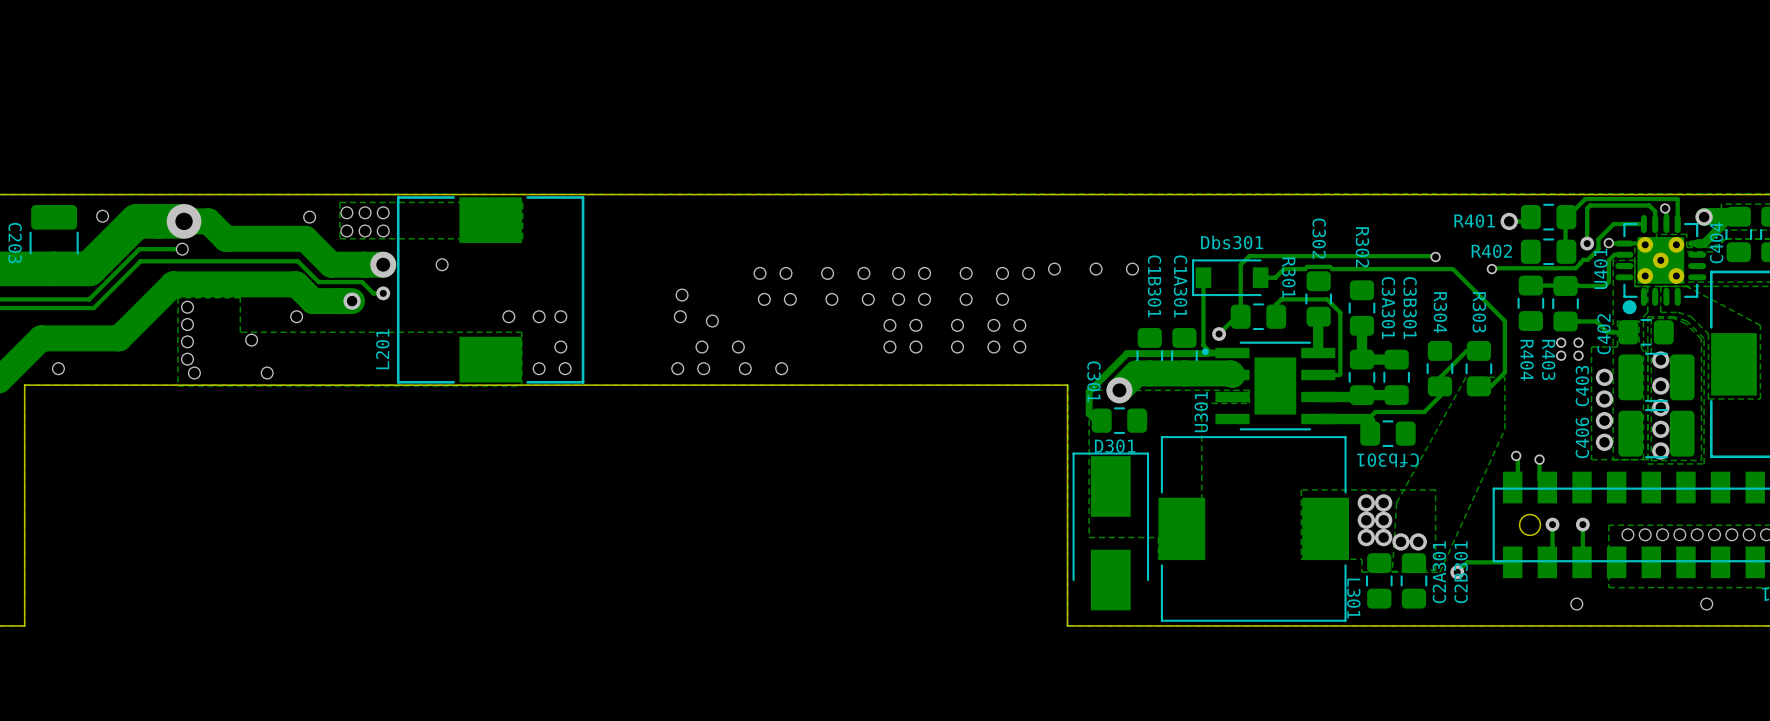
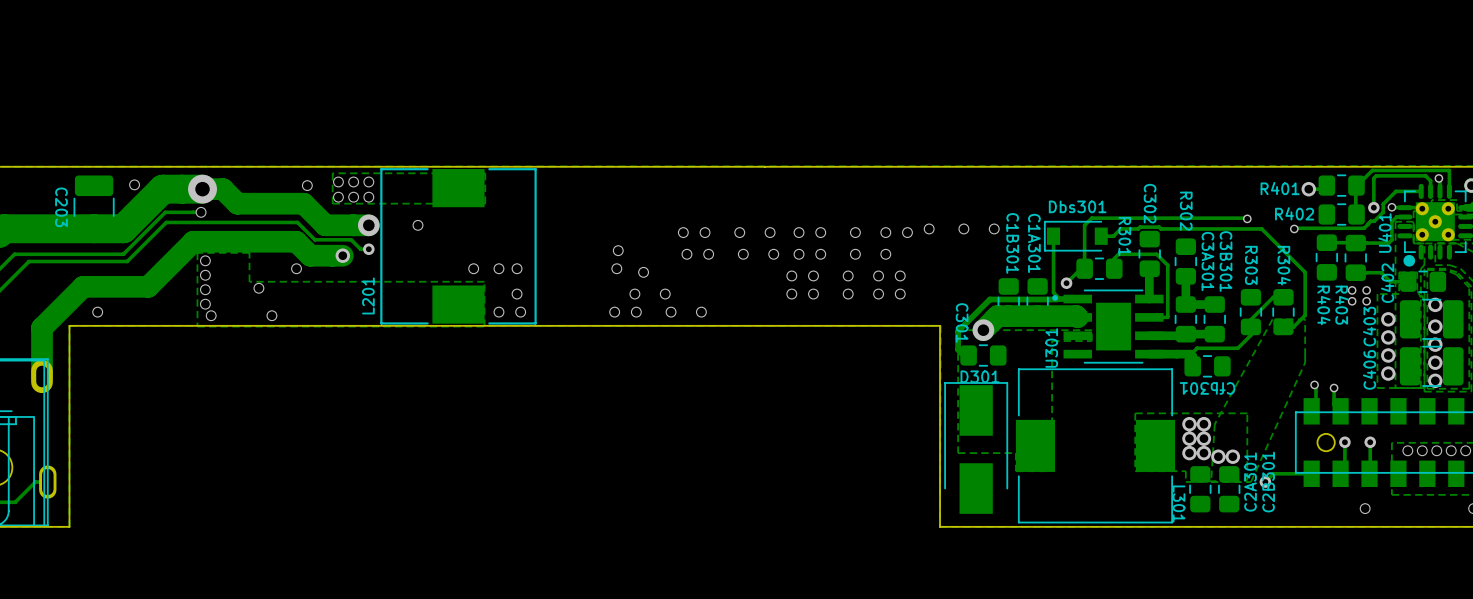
R304 name: R304 (1440, 312) -> R303 (1251, 265)
R303 name: R303 (1479, 312) -> R304 (1284, 265)

